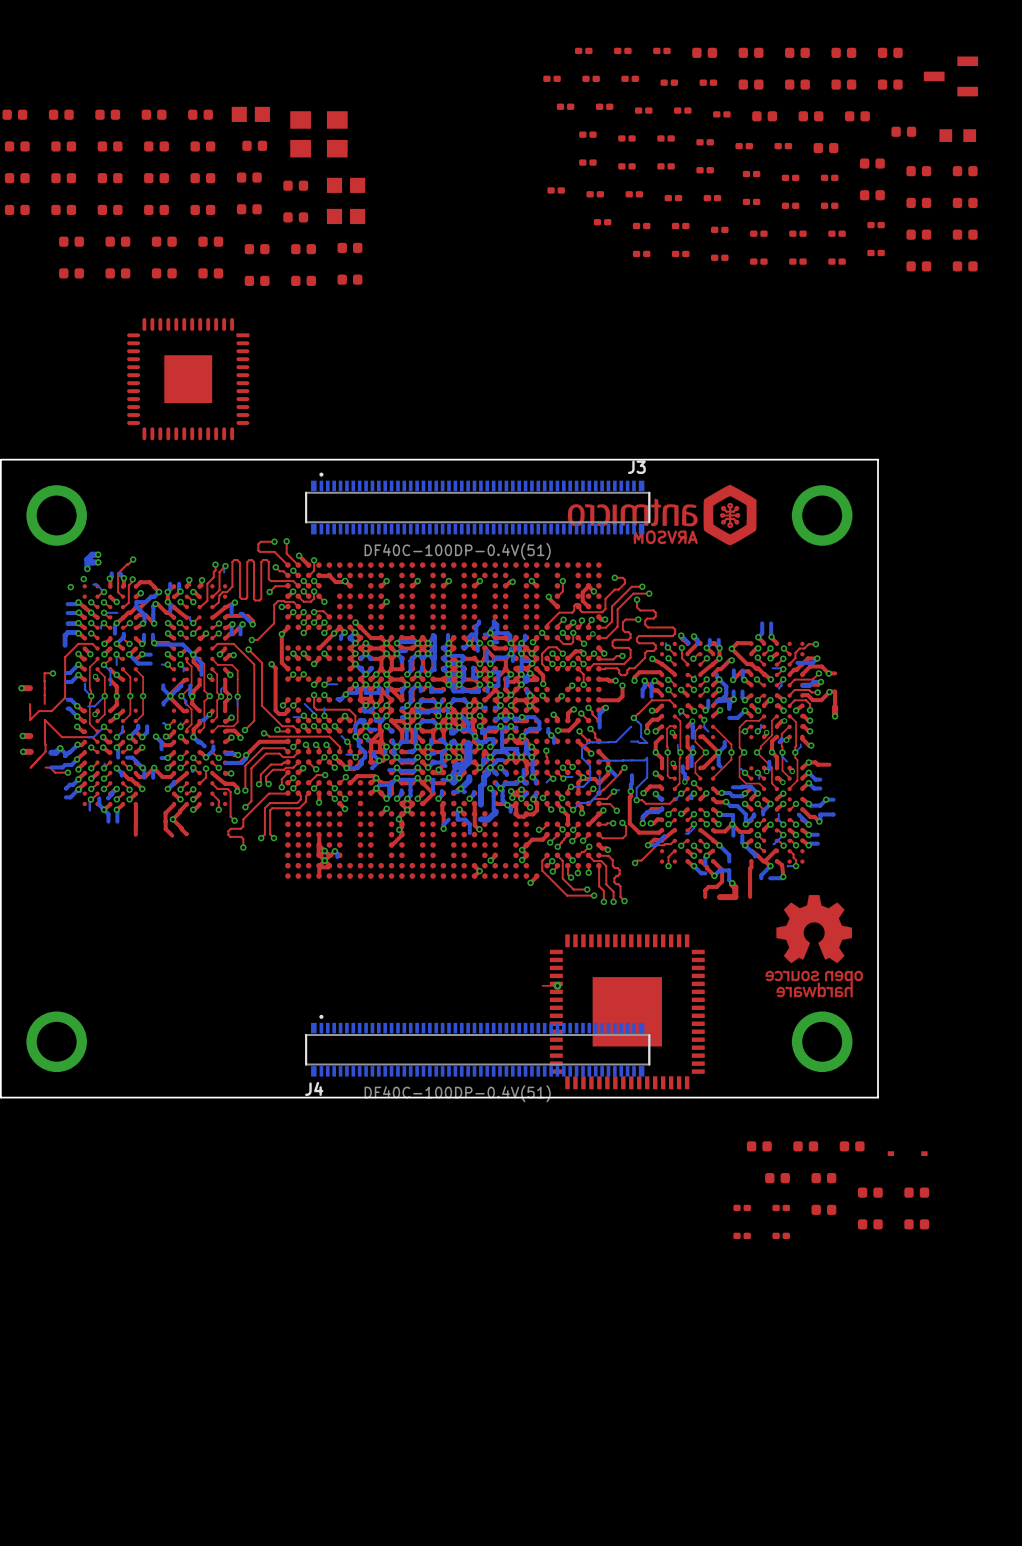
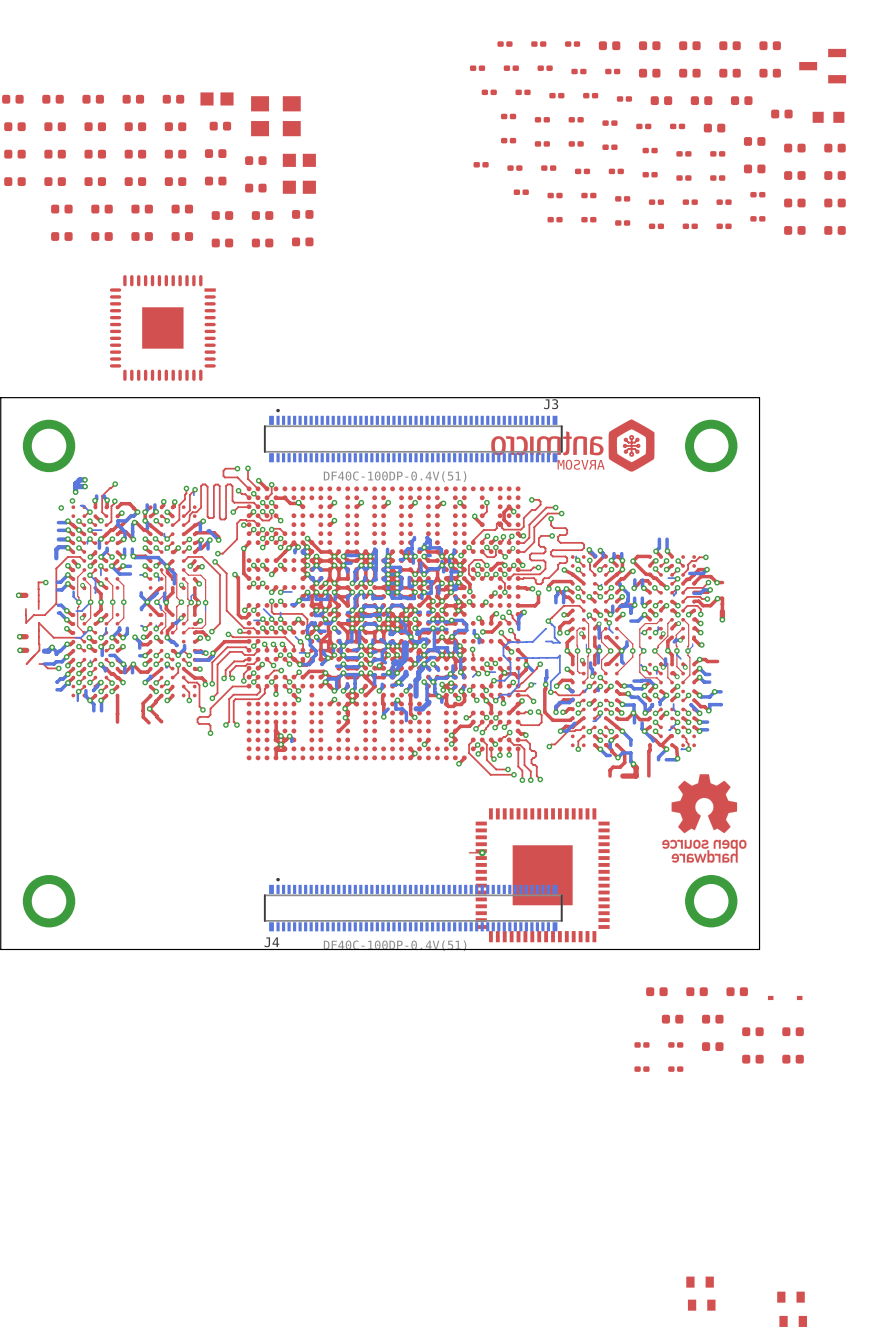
part: none -> (700, 1282)
part: none -> (790, 1297)
part: none -> (701, 1305)
part: none -> (793, 1321)

